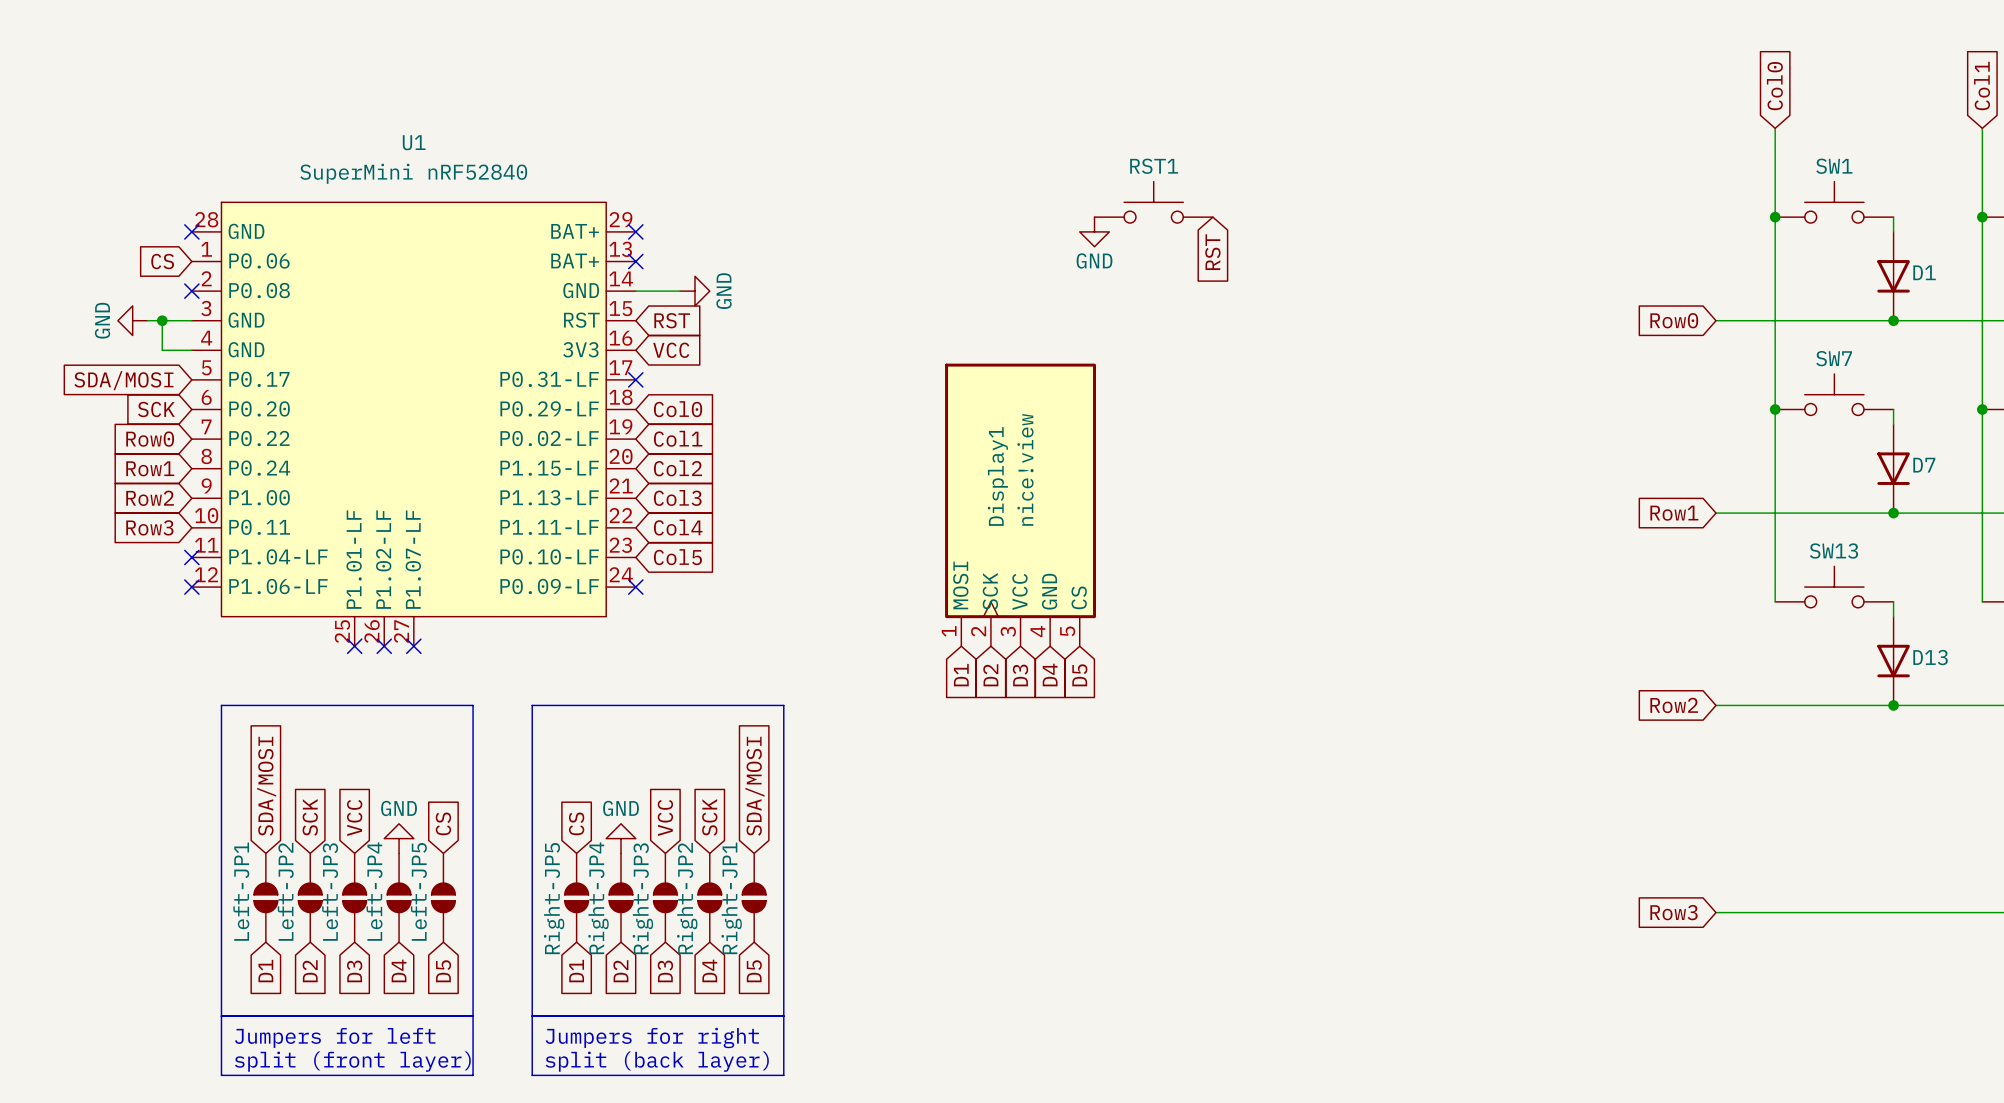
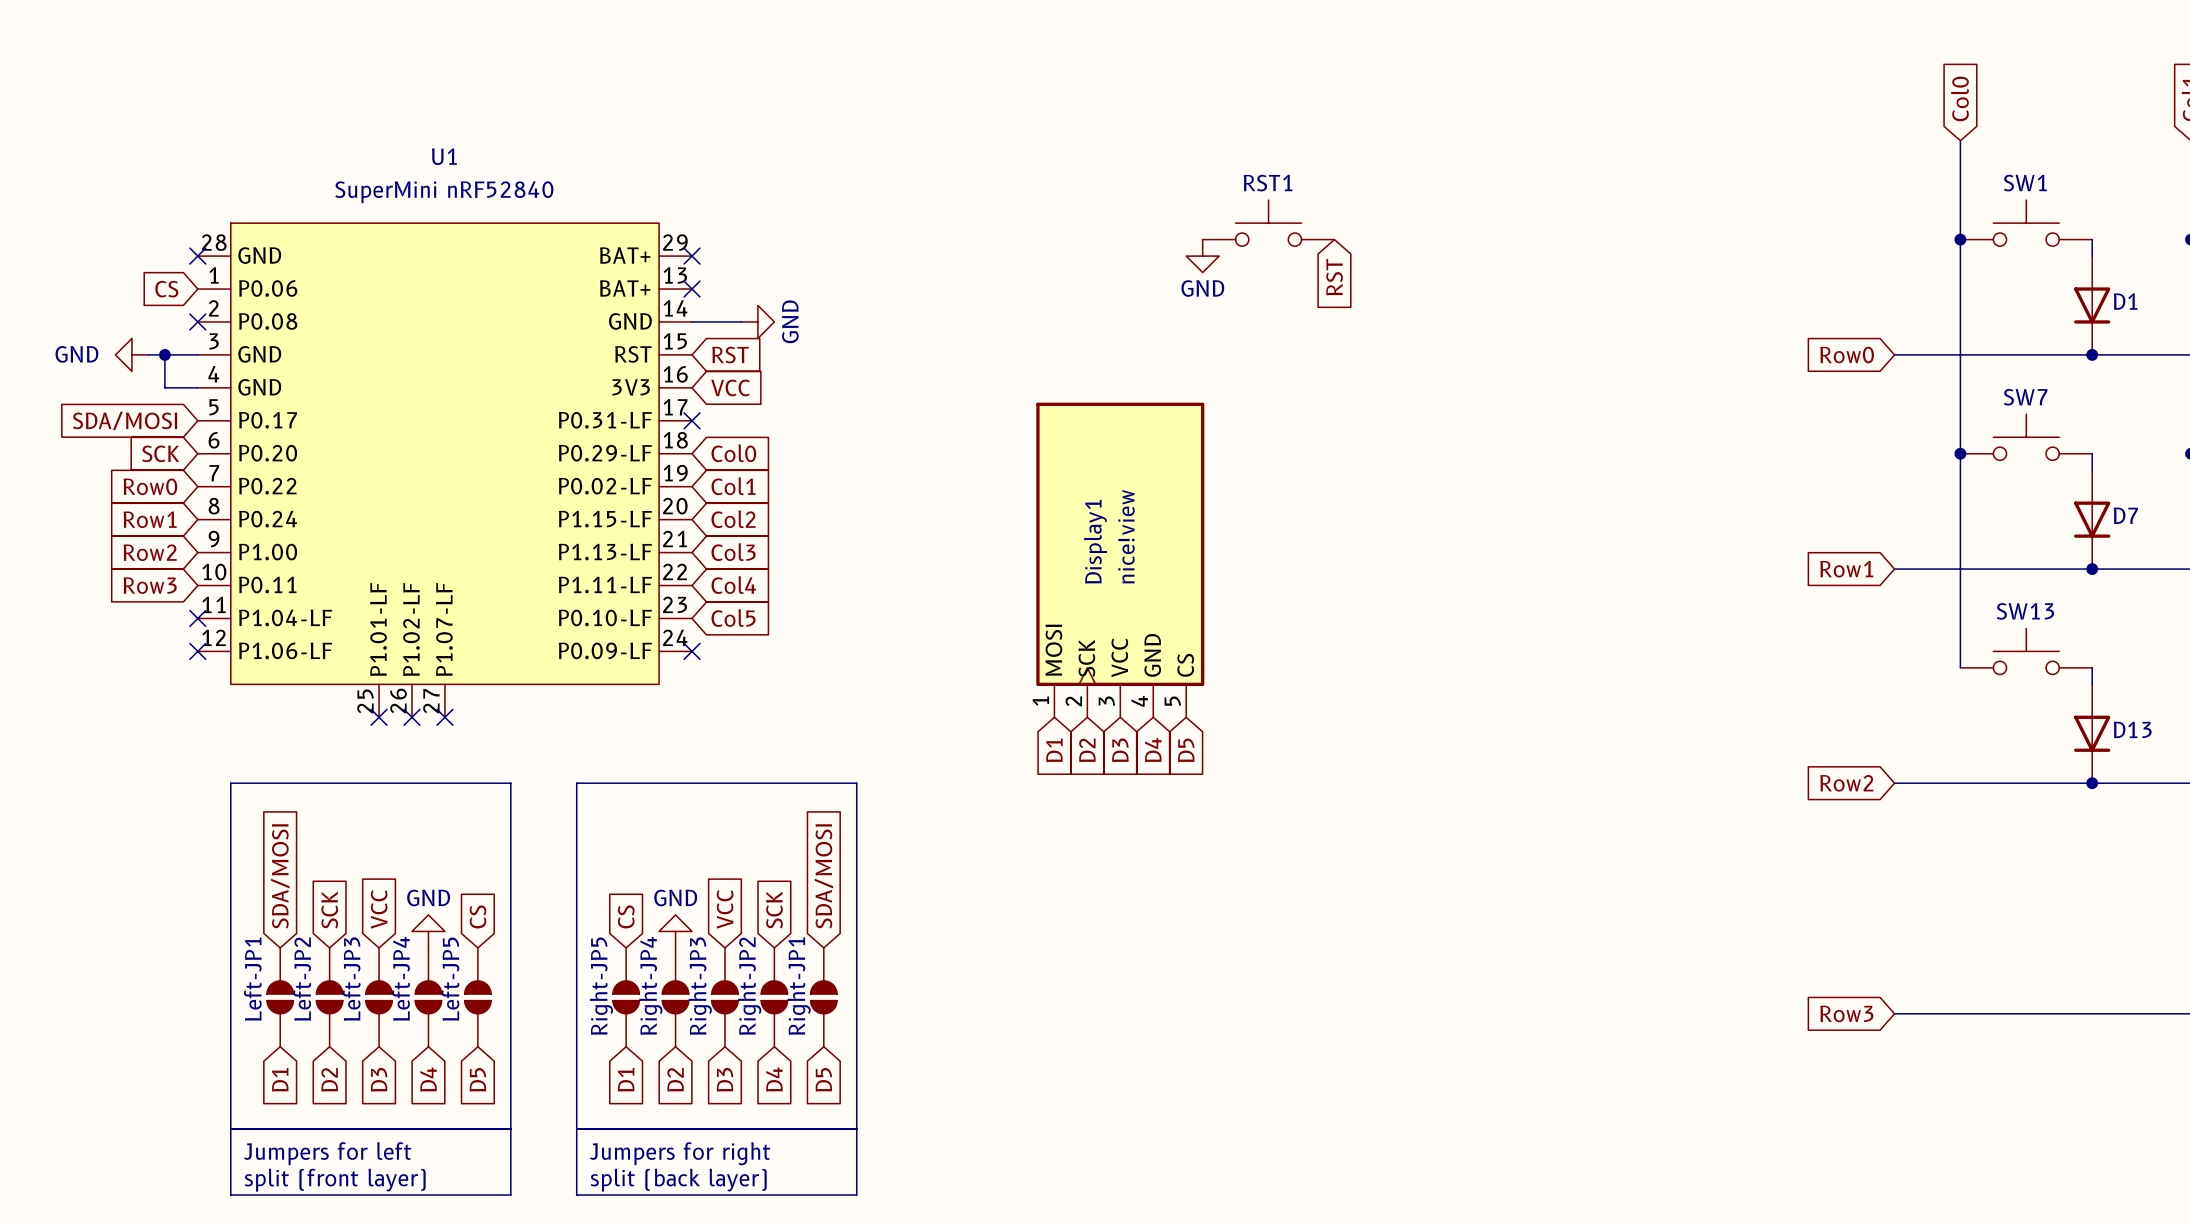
power symbol text rotation: 0° (102, 320) -> 90° clockwise (76, 354)

